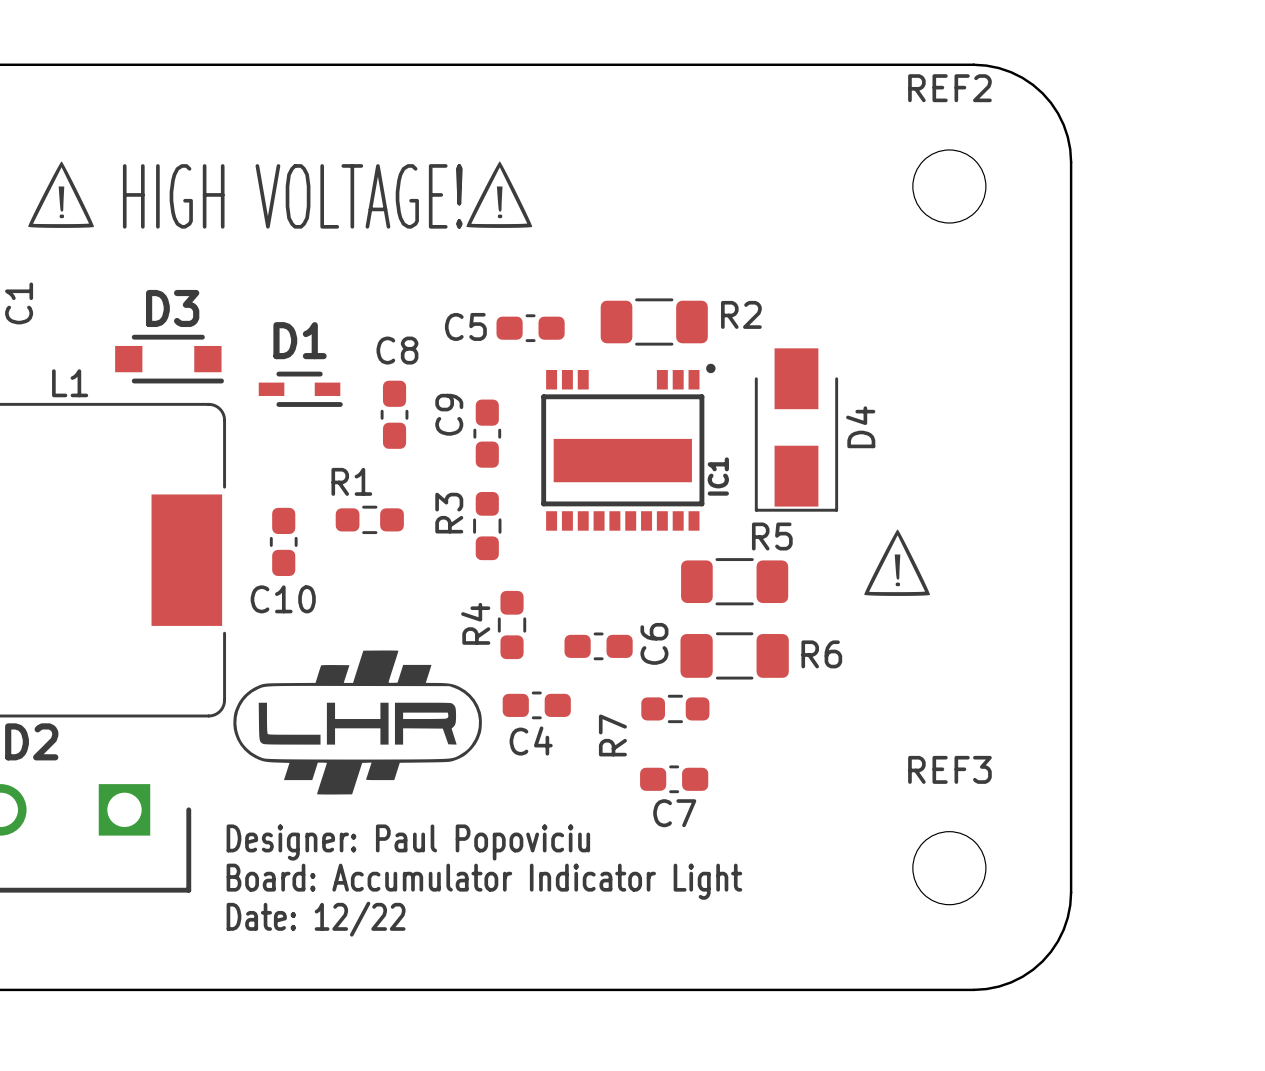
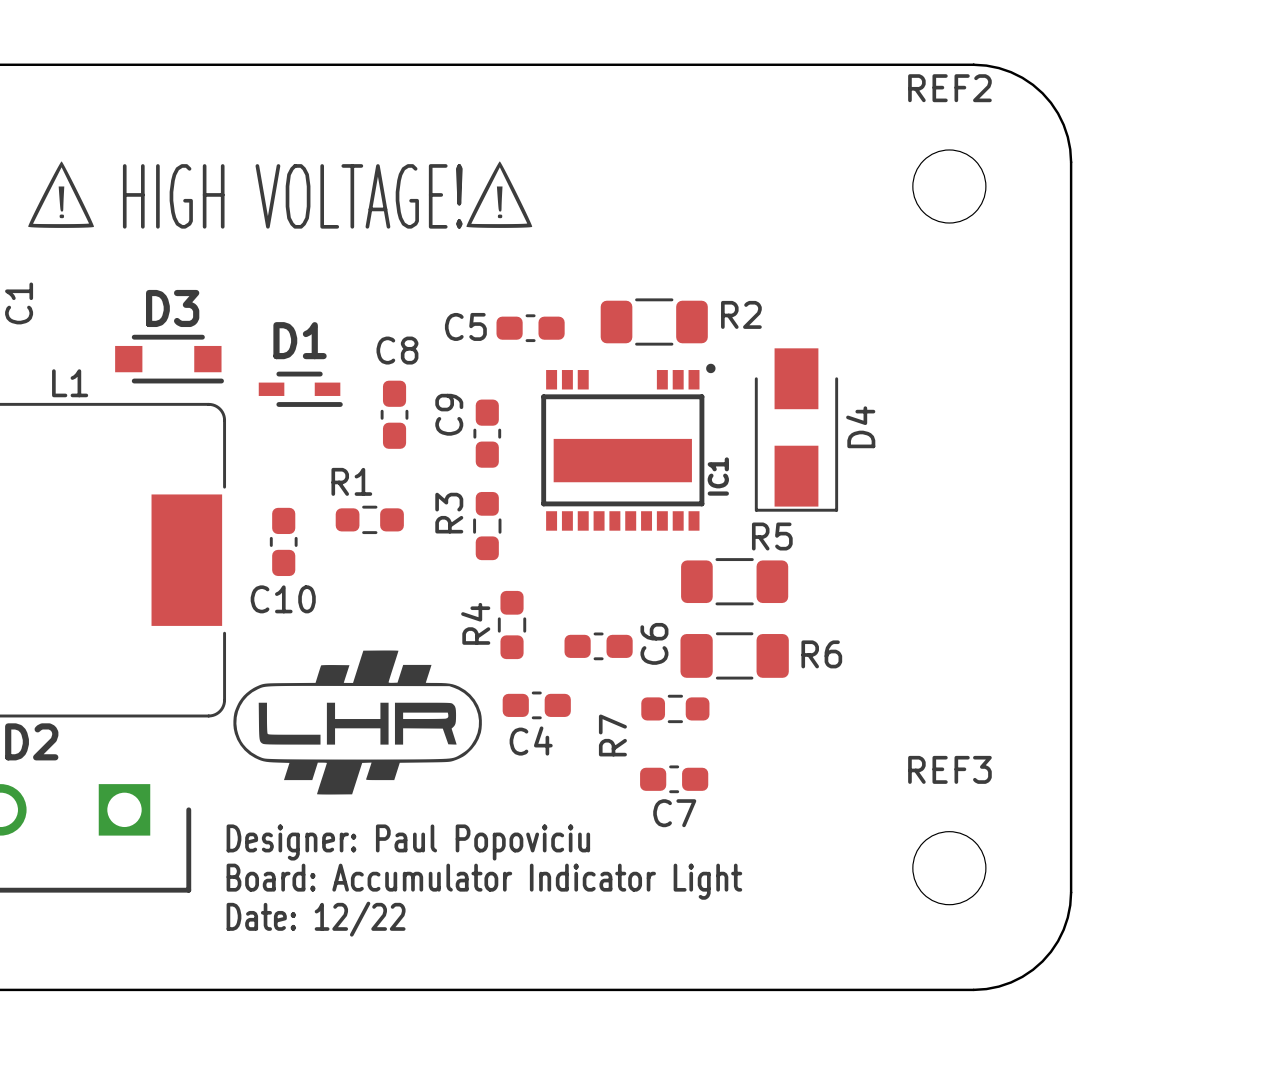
drawing: [864, 529, 931, 596] -> none

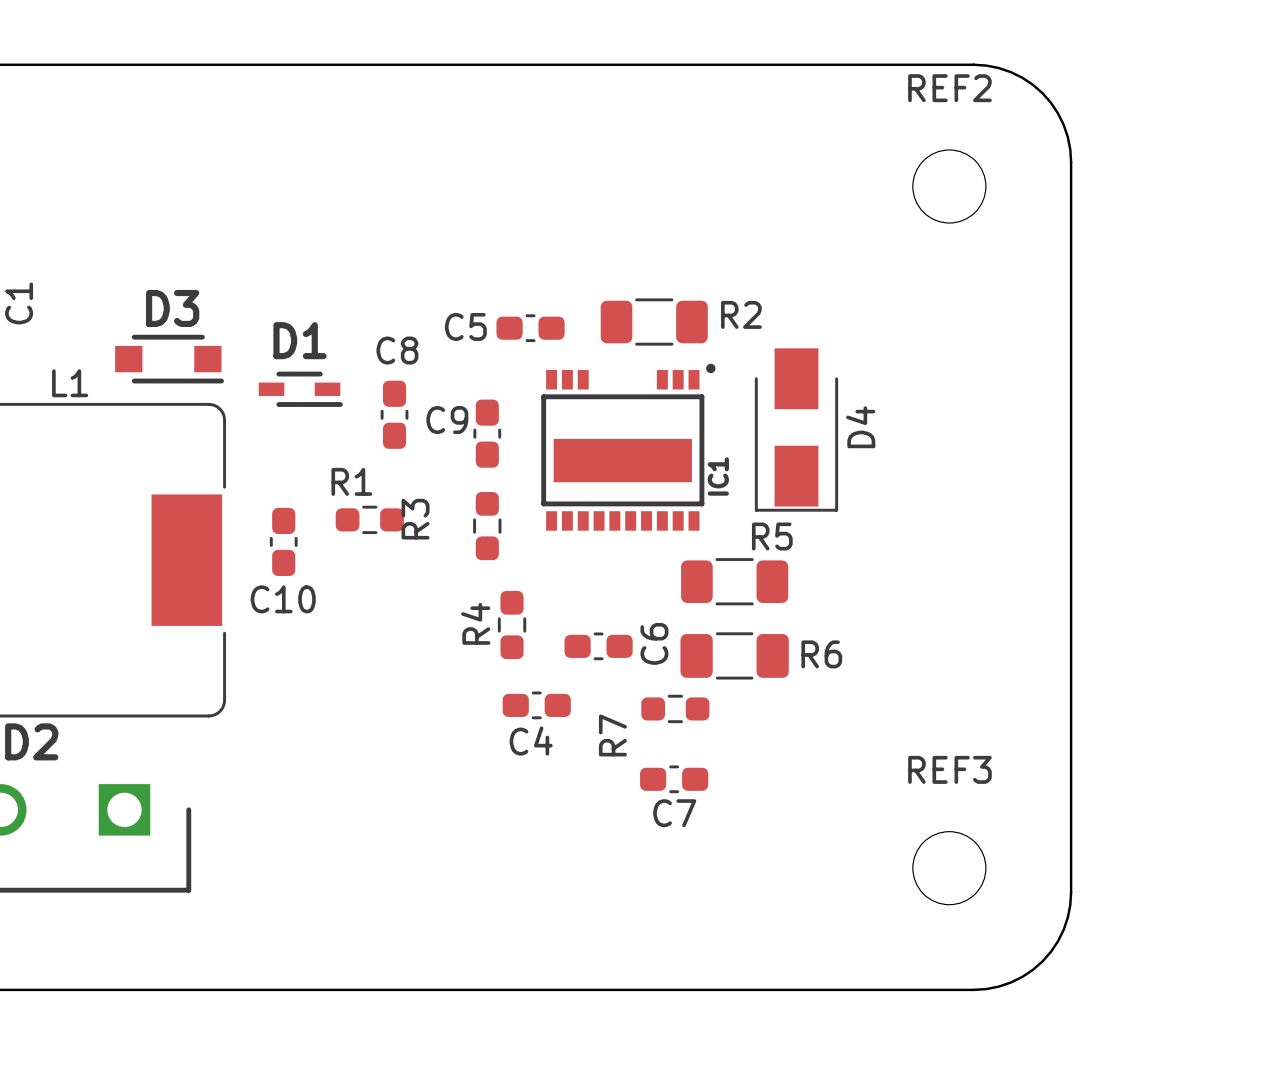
drawing: [28, 161, 94, 228] -> none
drawing: [466, 161, 533, 228] -> none
text: HIGH VOLTAGE! (292, 196) -> none
C9 name rotation: 0° (449, 414) -> 90° clockwise (447, 420)
R3 name position: R3 (449, 513) -> R3 (415, 519)
drawing: [233, 650, 482, 795] -> none
text: Designer: Paul Popoviciu (408, 842) -> none
text: Board: Accumulator Indicator Light (484, 881) -> none
text: Date: 12/22 (316, 919) -> none

